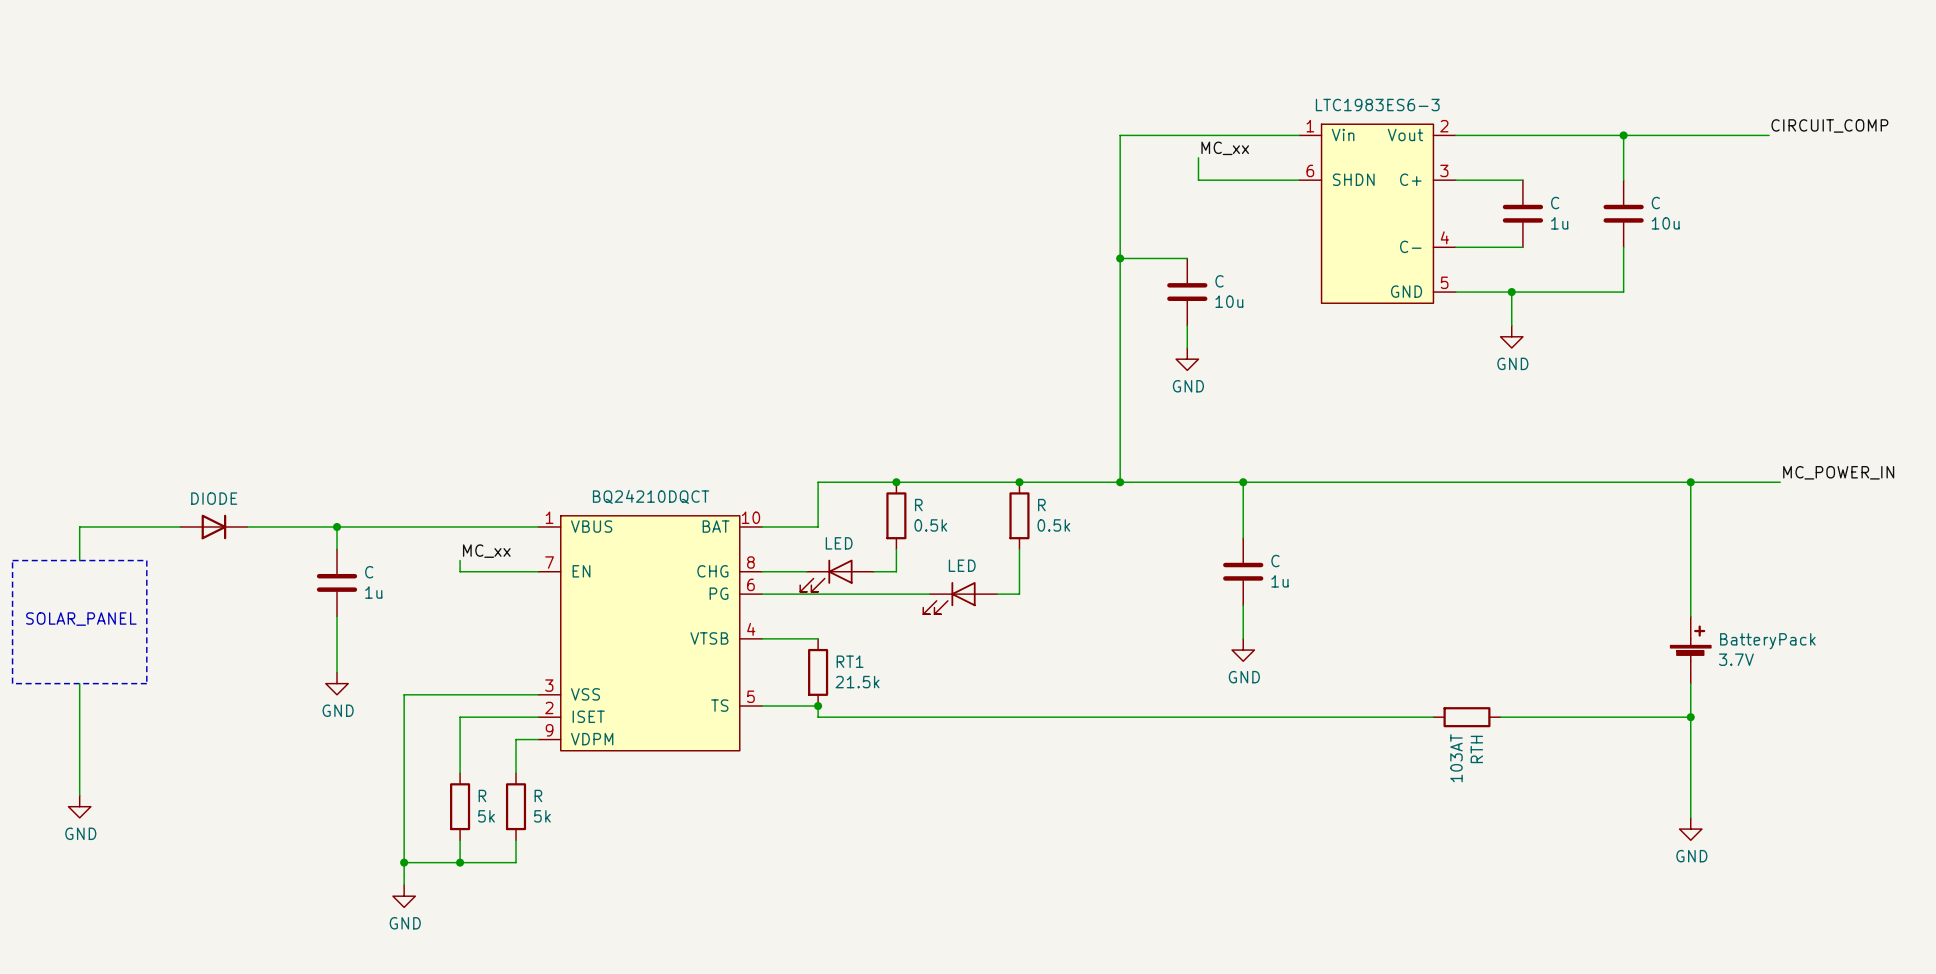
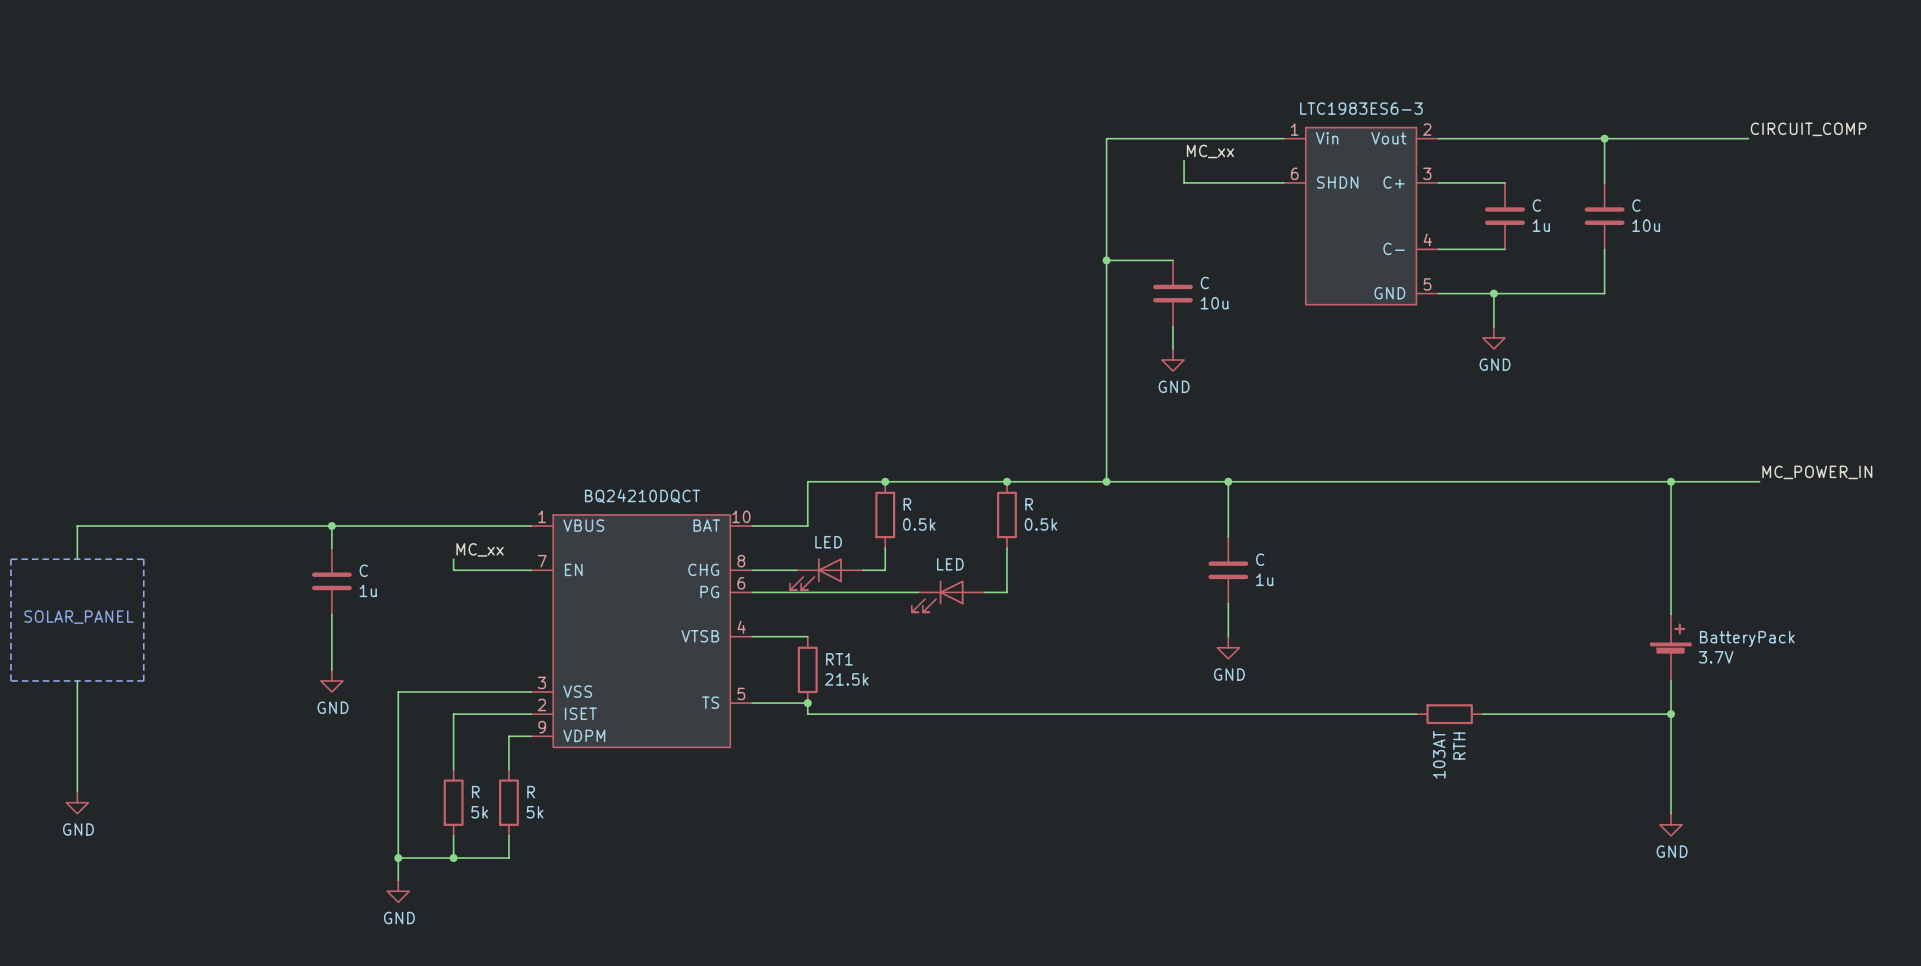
part: DIODE (213, 526) -> none

